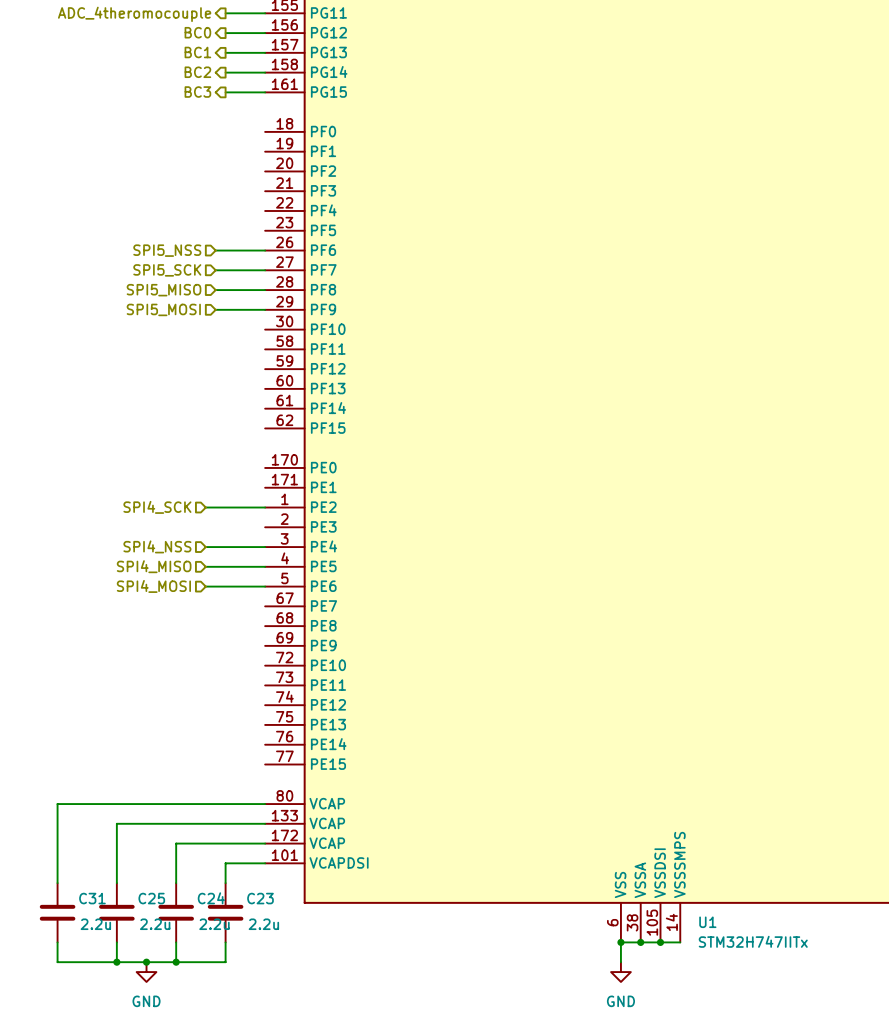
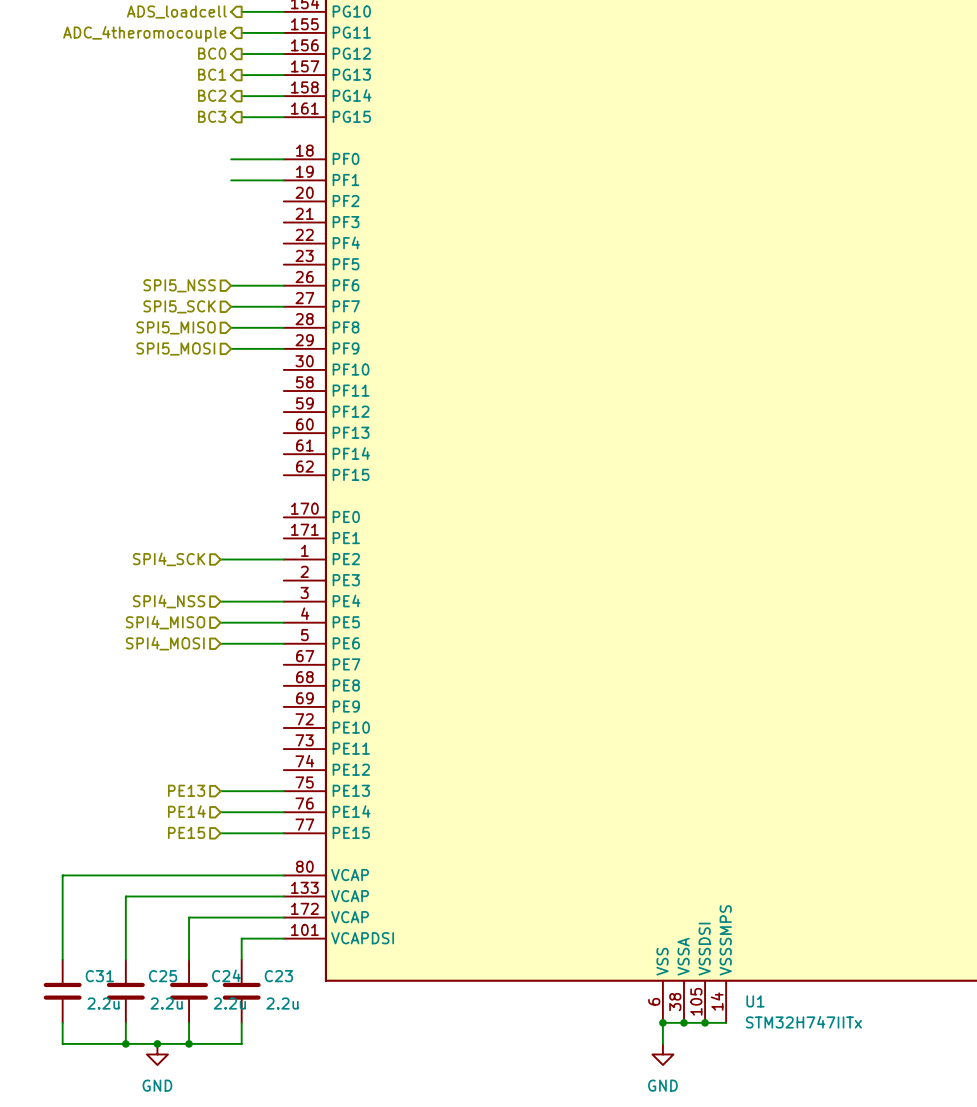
wire: none -> (231, 159) (283, 159)
wire: none -> (231, 180) (283, 180)
hierarchical label: none -> PE13 (186, 790)
wire: none -> (220, 791) (283, 791)
hierarchical label: none -> PE14 (186, 811)
wire: none -> (220, 812) (283, 812)
hierarchical label: none -> PE15 (186, 832)
wire: none -> (220, 833) (283, 833)

